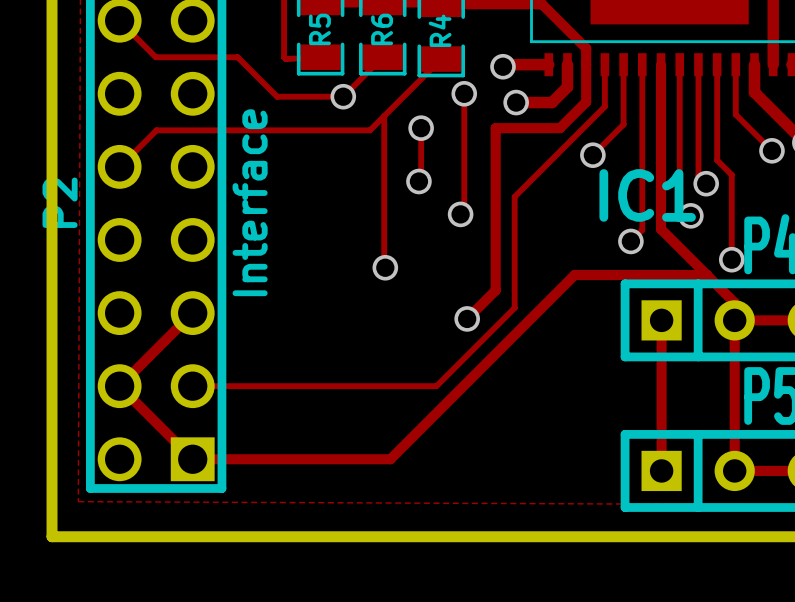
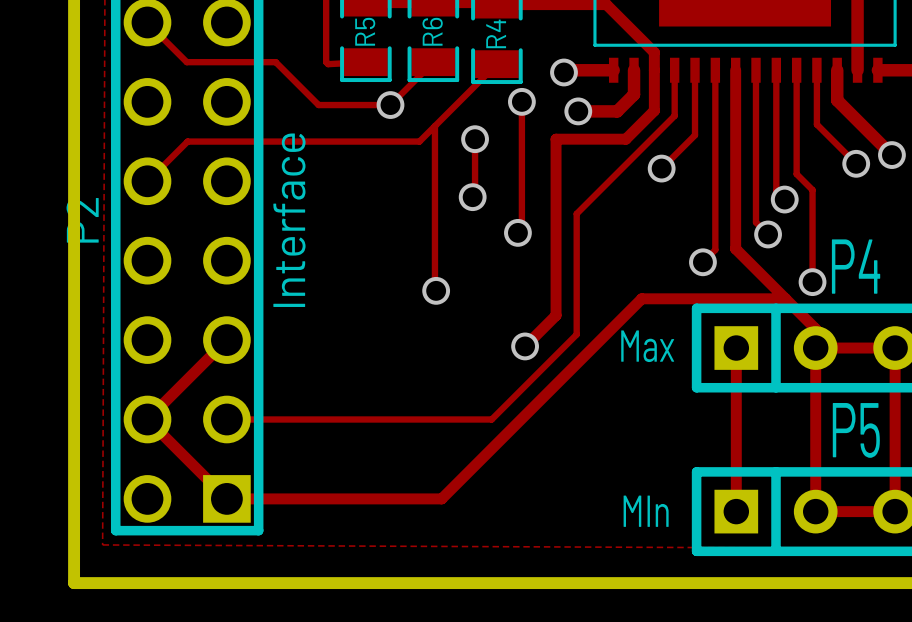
IC1 name: IC1 (647, 195) -> none
text: none -> Max (647, 346)
text: none -> MIn (646, 511)

